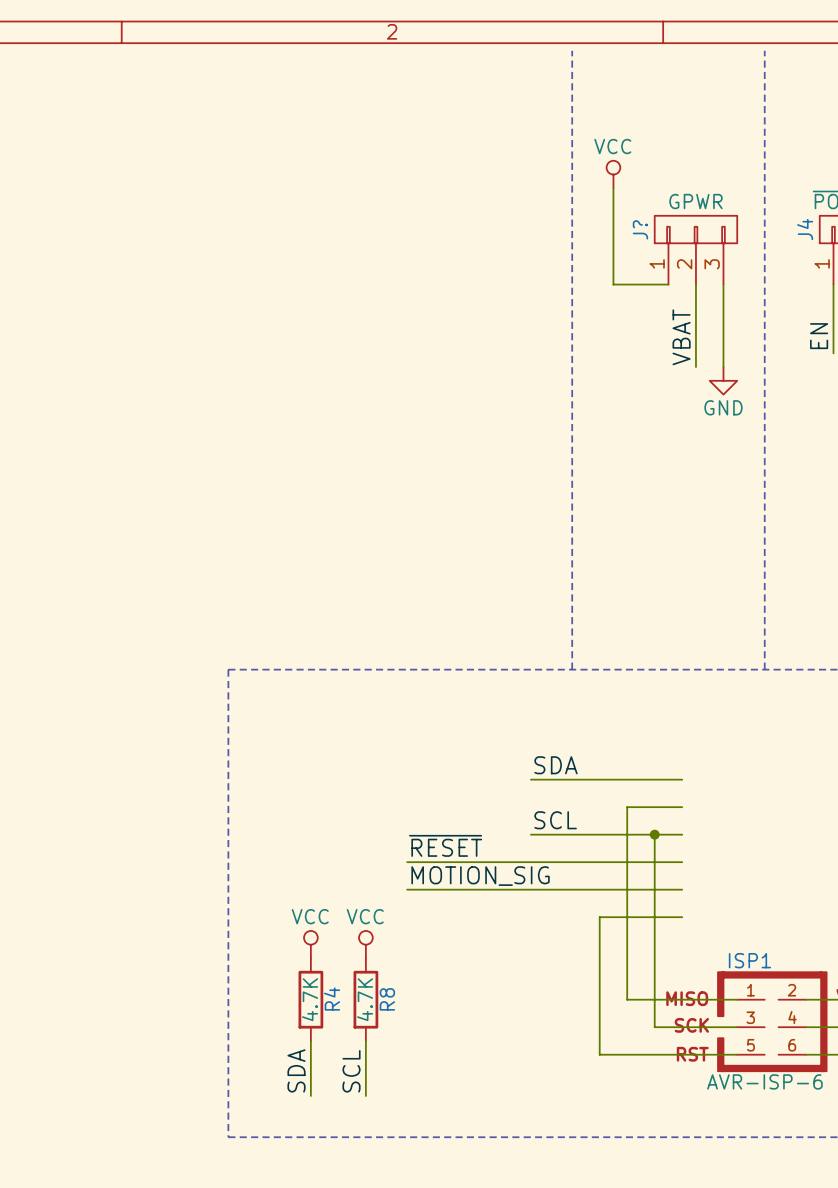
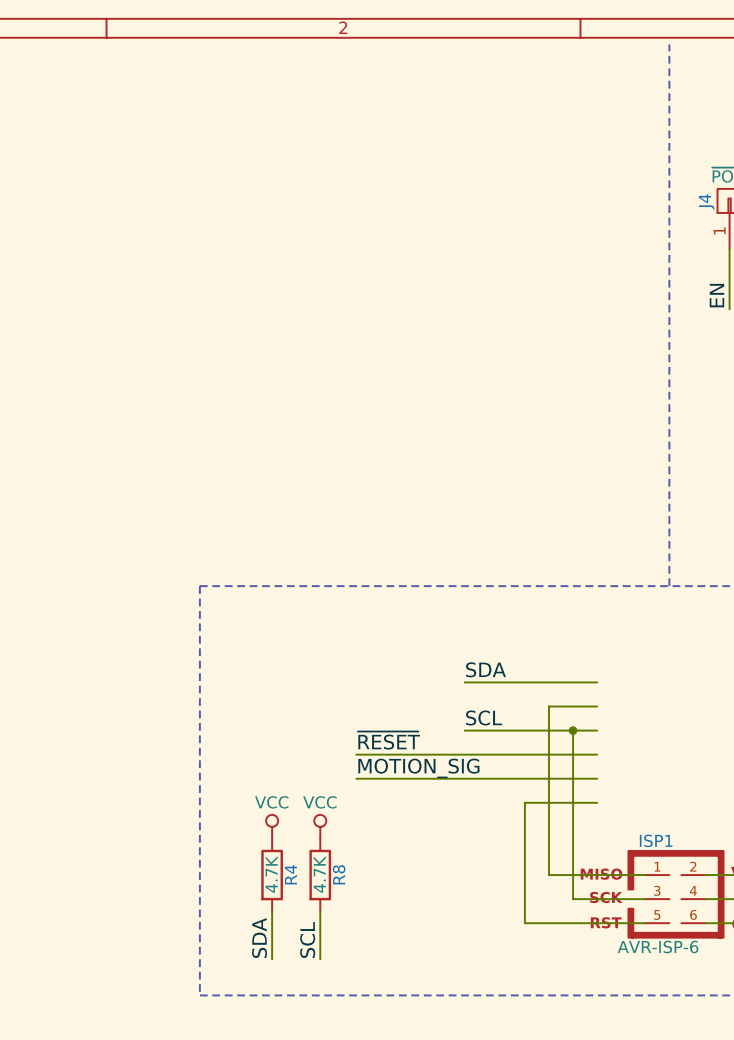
line: (572, 50) (572, 669) -> none
power symbol: VCC (613, 174) -> none
wire: (613, 188) (613, 284) (668, 284) -> none
J?: GPWR (695, 250) -> none
wire: (695, 284) (695, 367) -> none
wire: (723, 284) (723, 367) -> none
label: VBAT (681, 337) -> none
power symbol: GND (723, 380) -> none

